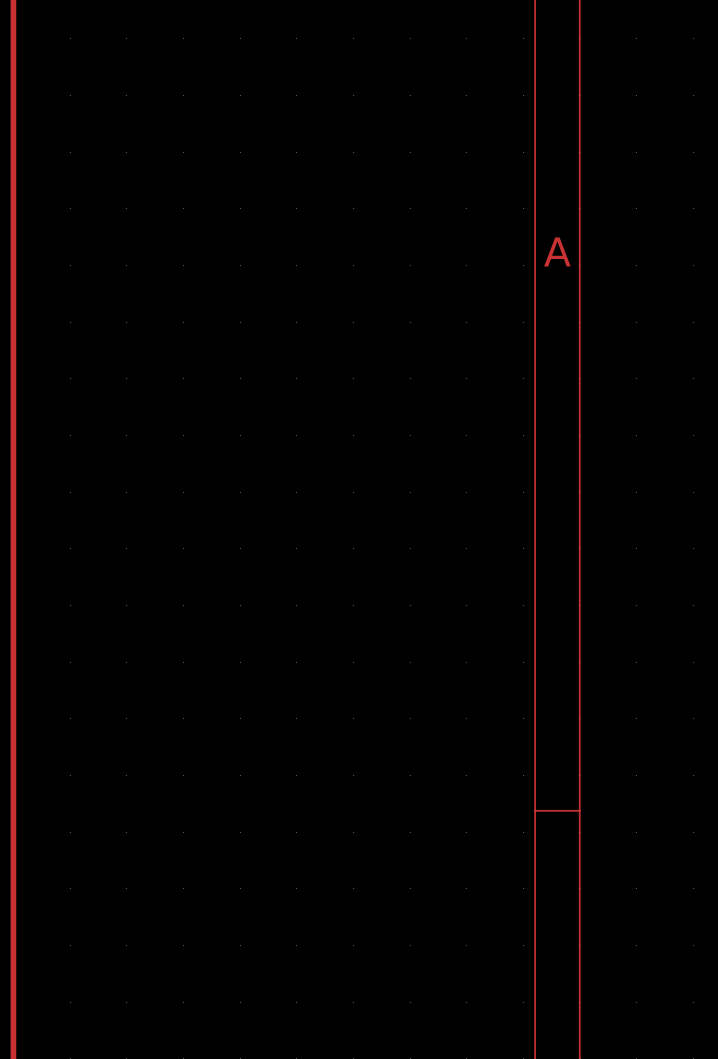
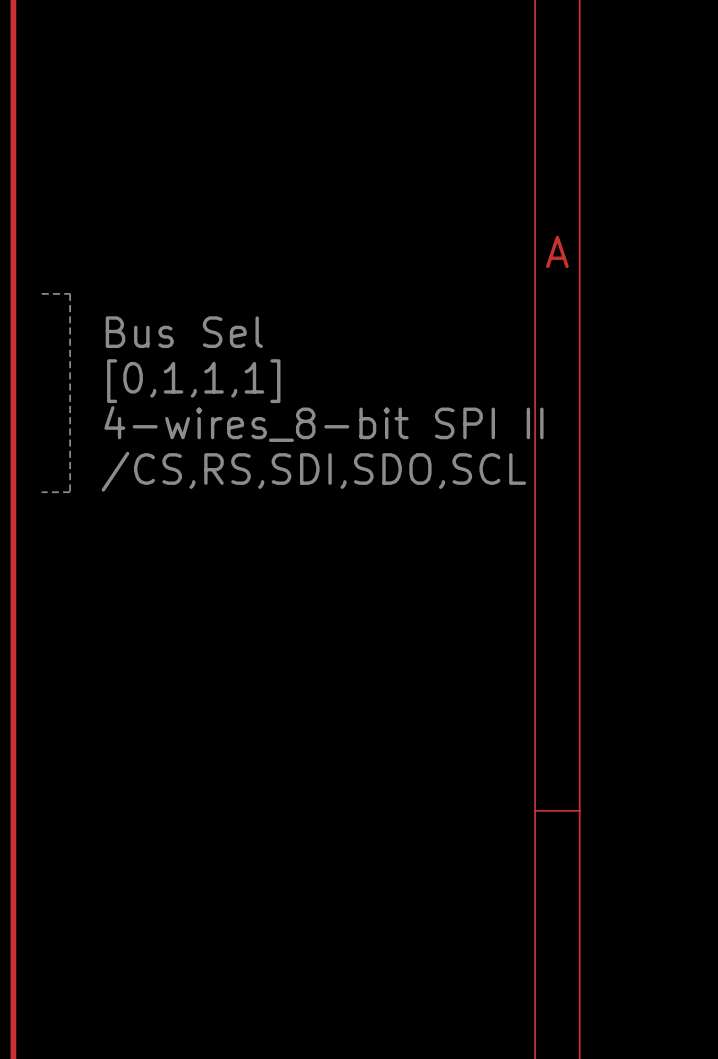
line: none -> (41, 293) (70, 293) (70, 492) (41, 492)
text: none -> Bus Sel (184, 332)
text: none -> [0,1,1,1] (193, 381)
text: none -> 4-wires_8-bit SPI II (323, 424)
text: none -> /CS,RS,SDI,SDO,SCL (313, 471)

